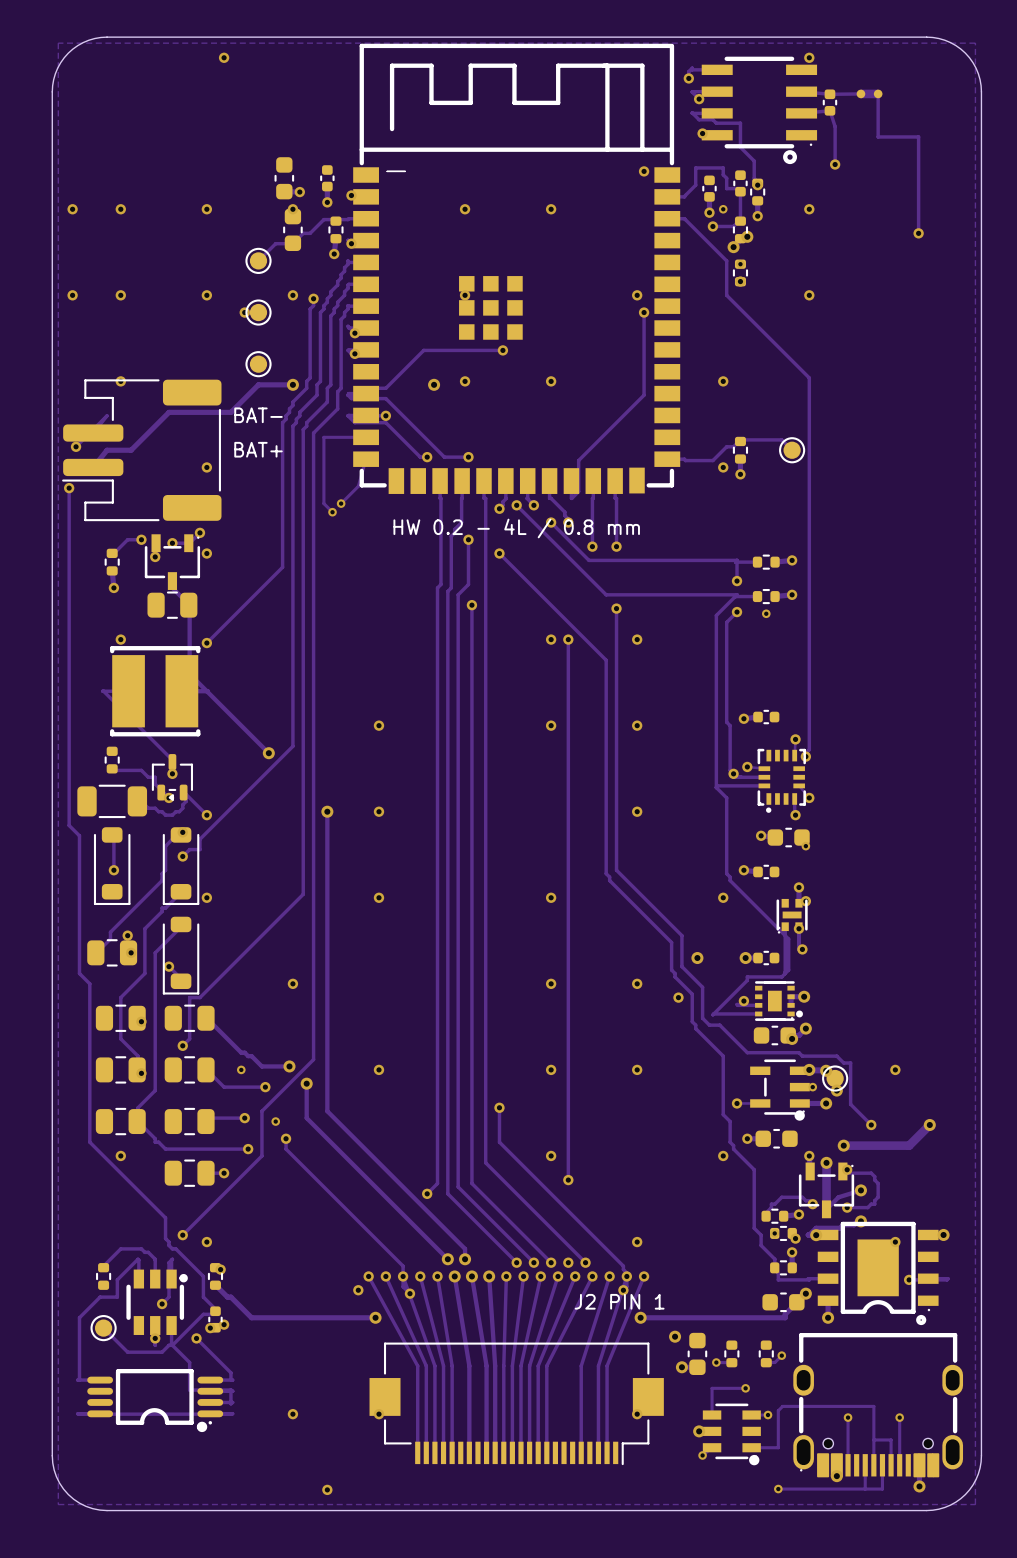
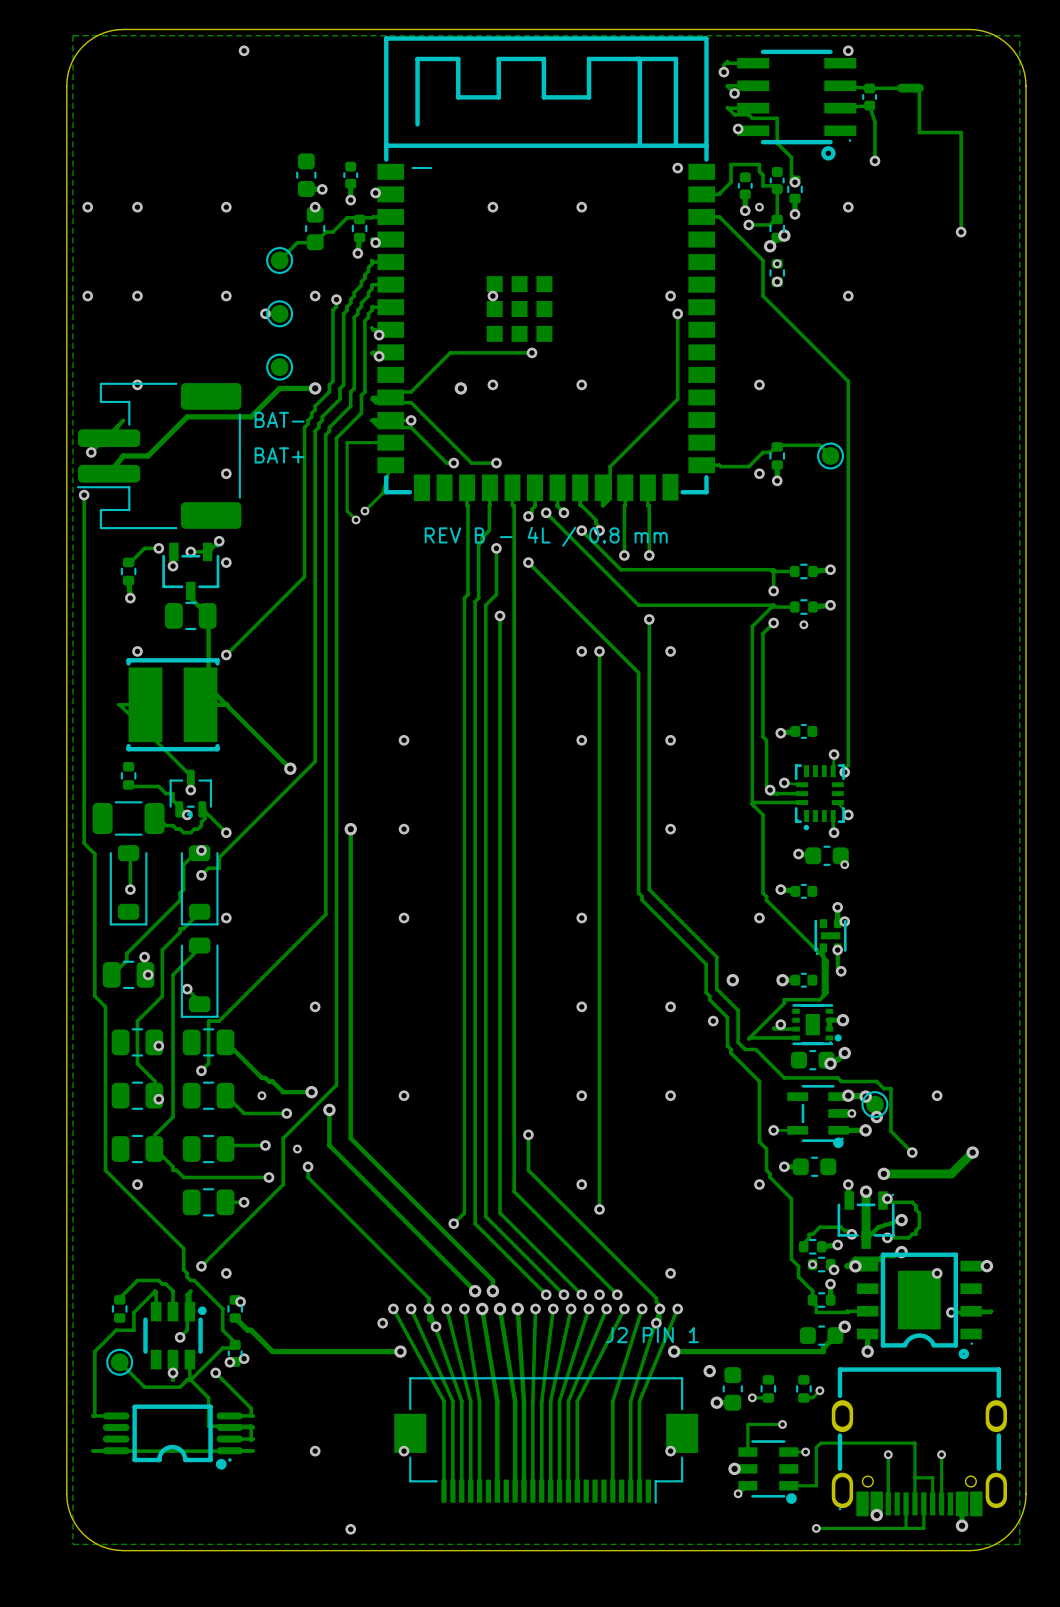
text: HW 0.2 - 4L / 0.8 mm (516, 528) -> REV B - 4L / 0.8 mm (546, 536)

